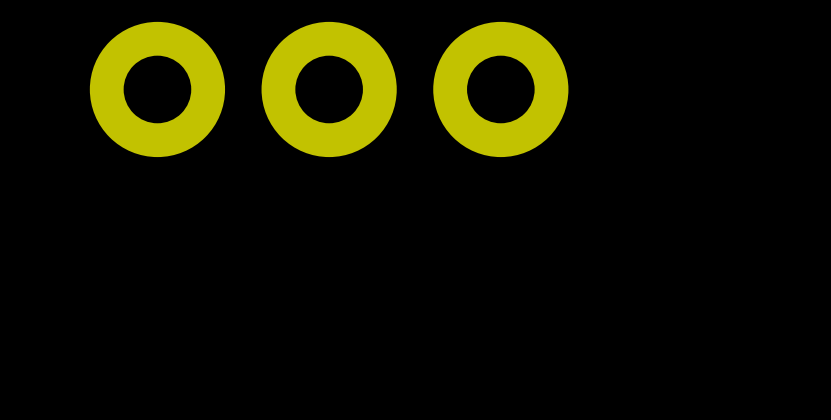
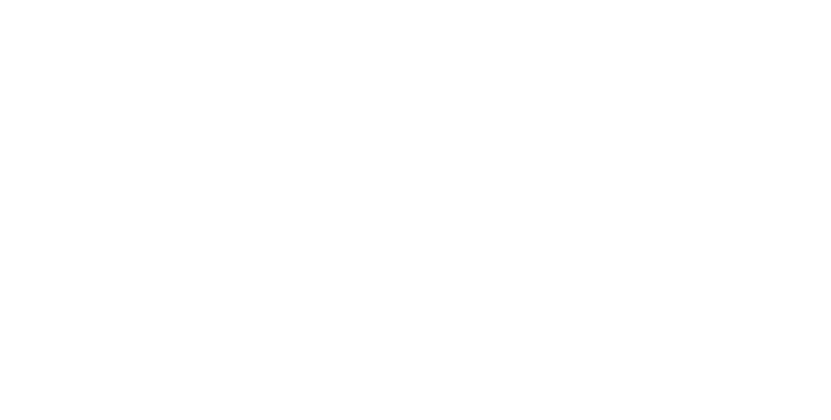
part: (329, 89) -> none

